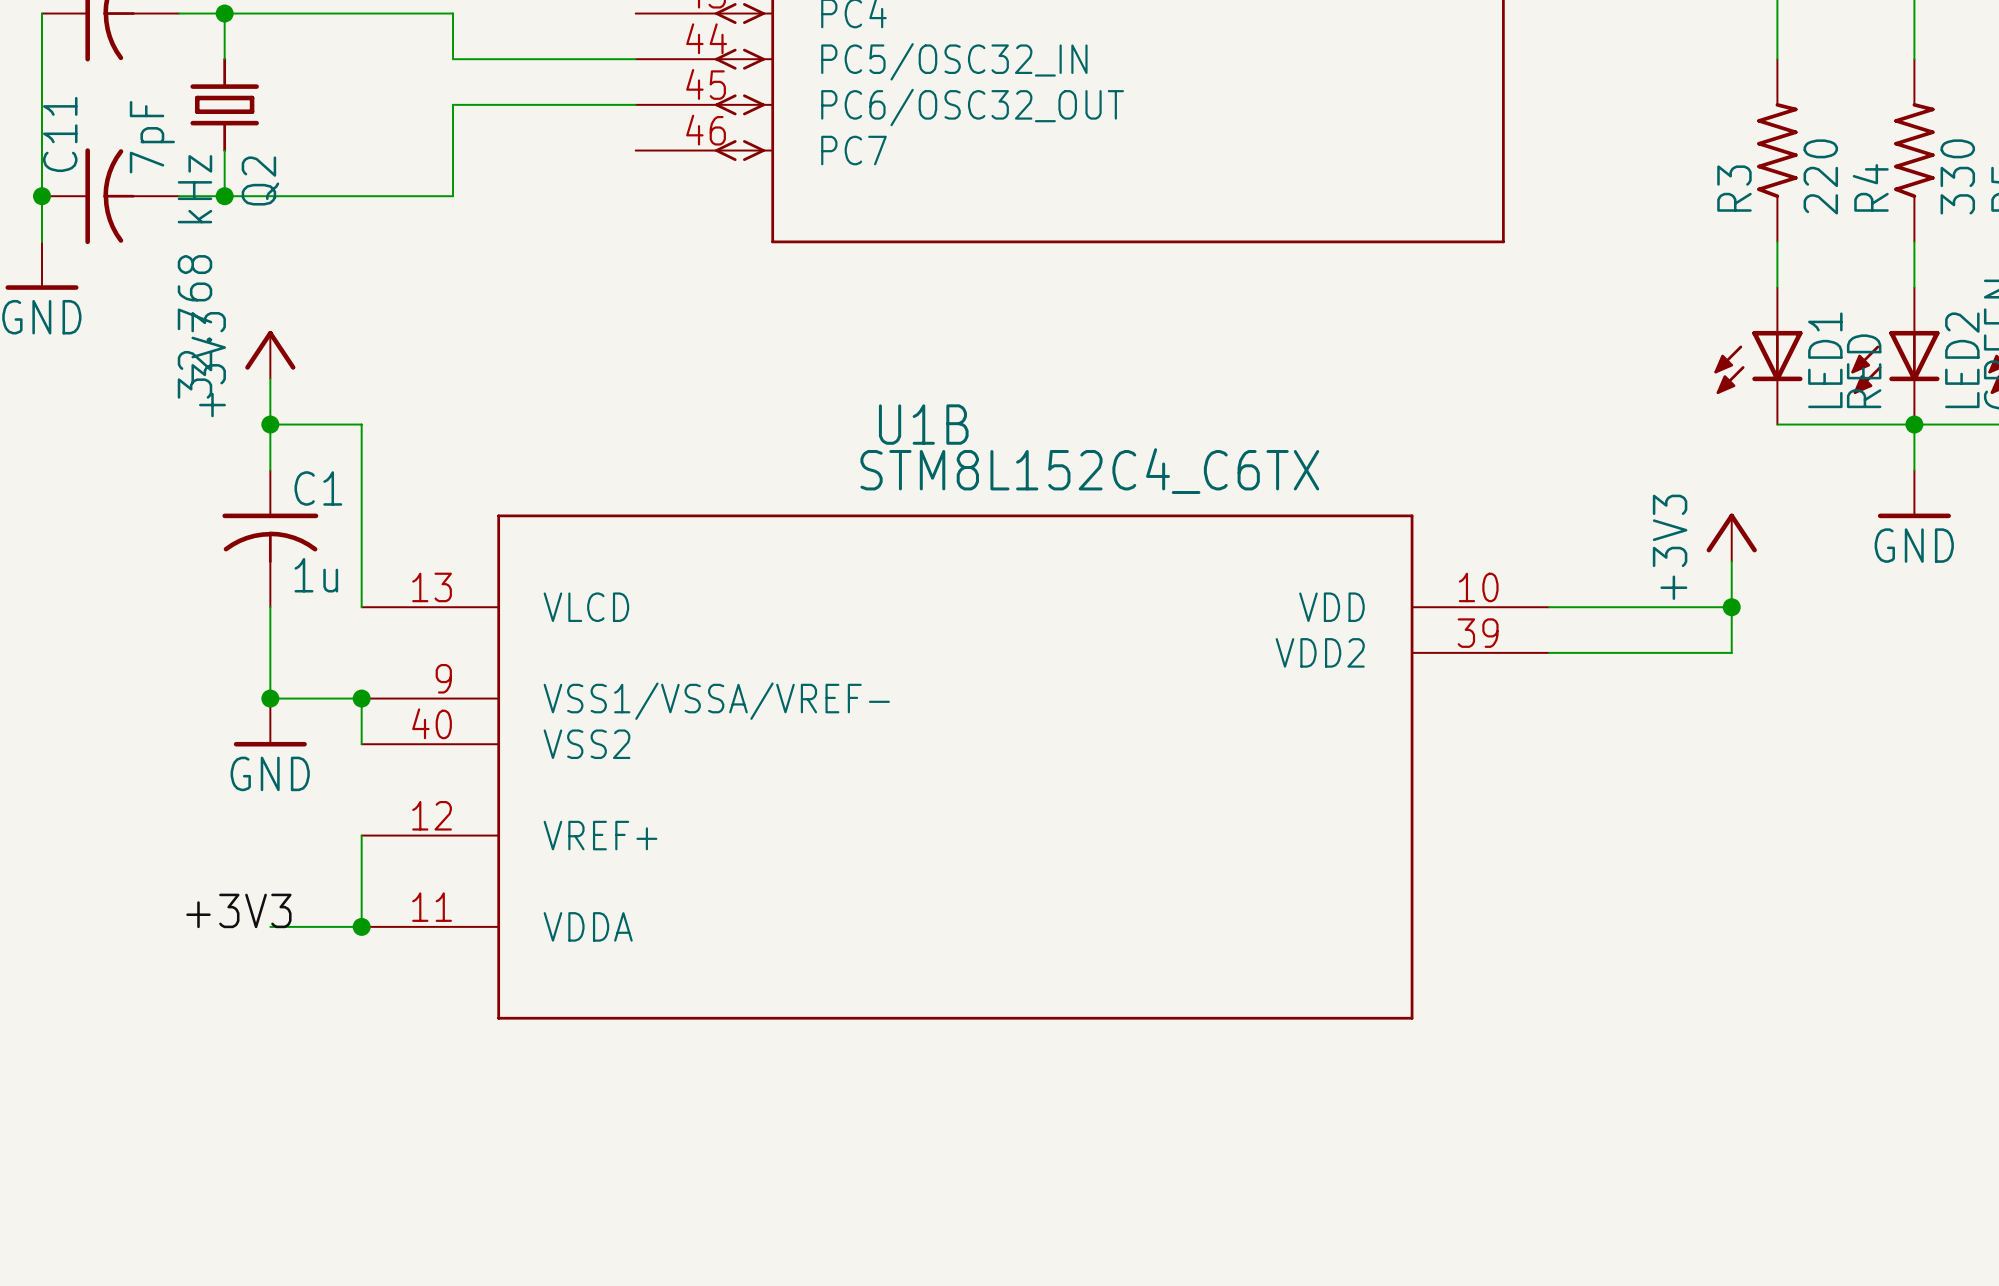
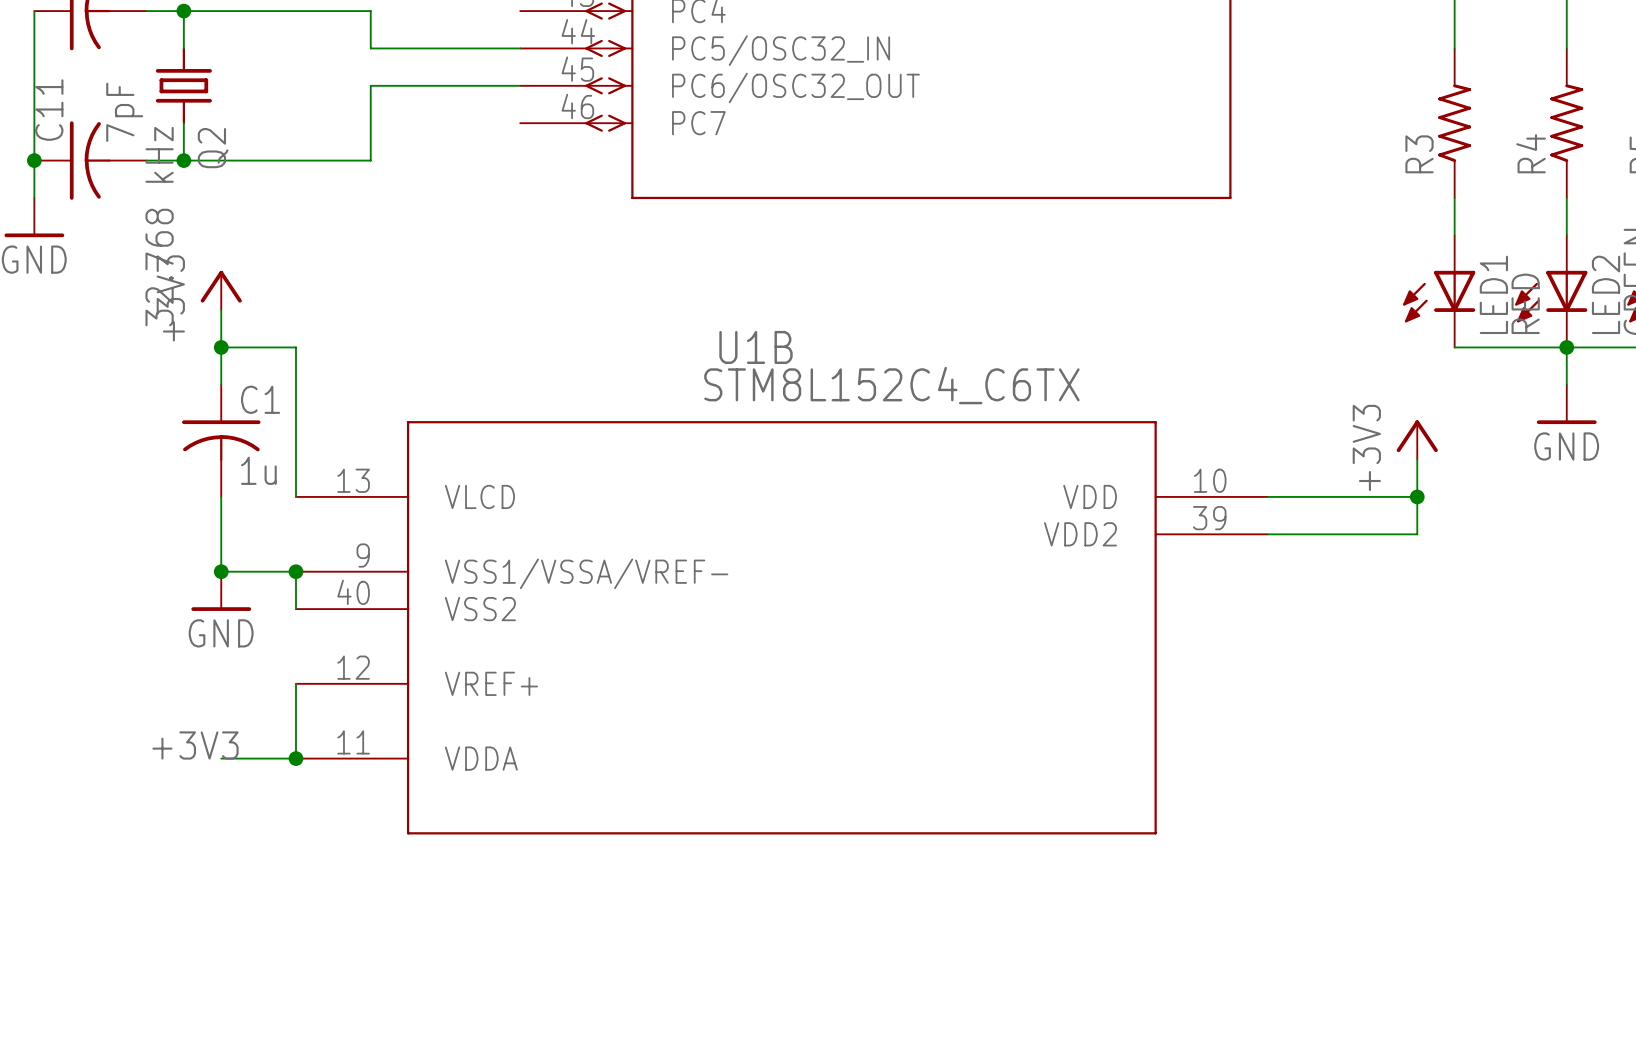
R3 value: 220 (1820, 176) -> none
R4 value: 330 (1957, 176) -> none

